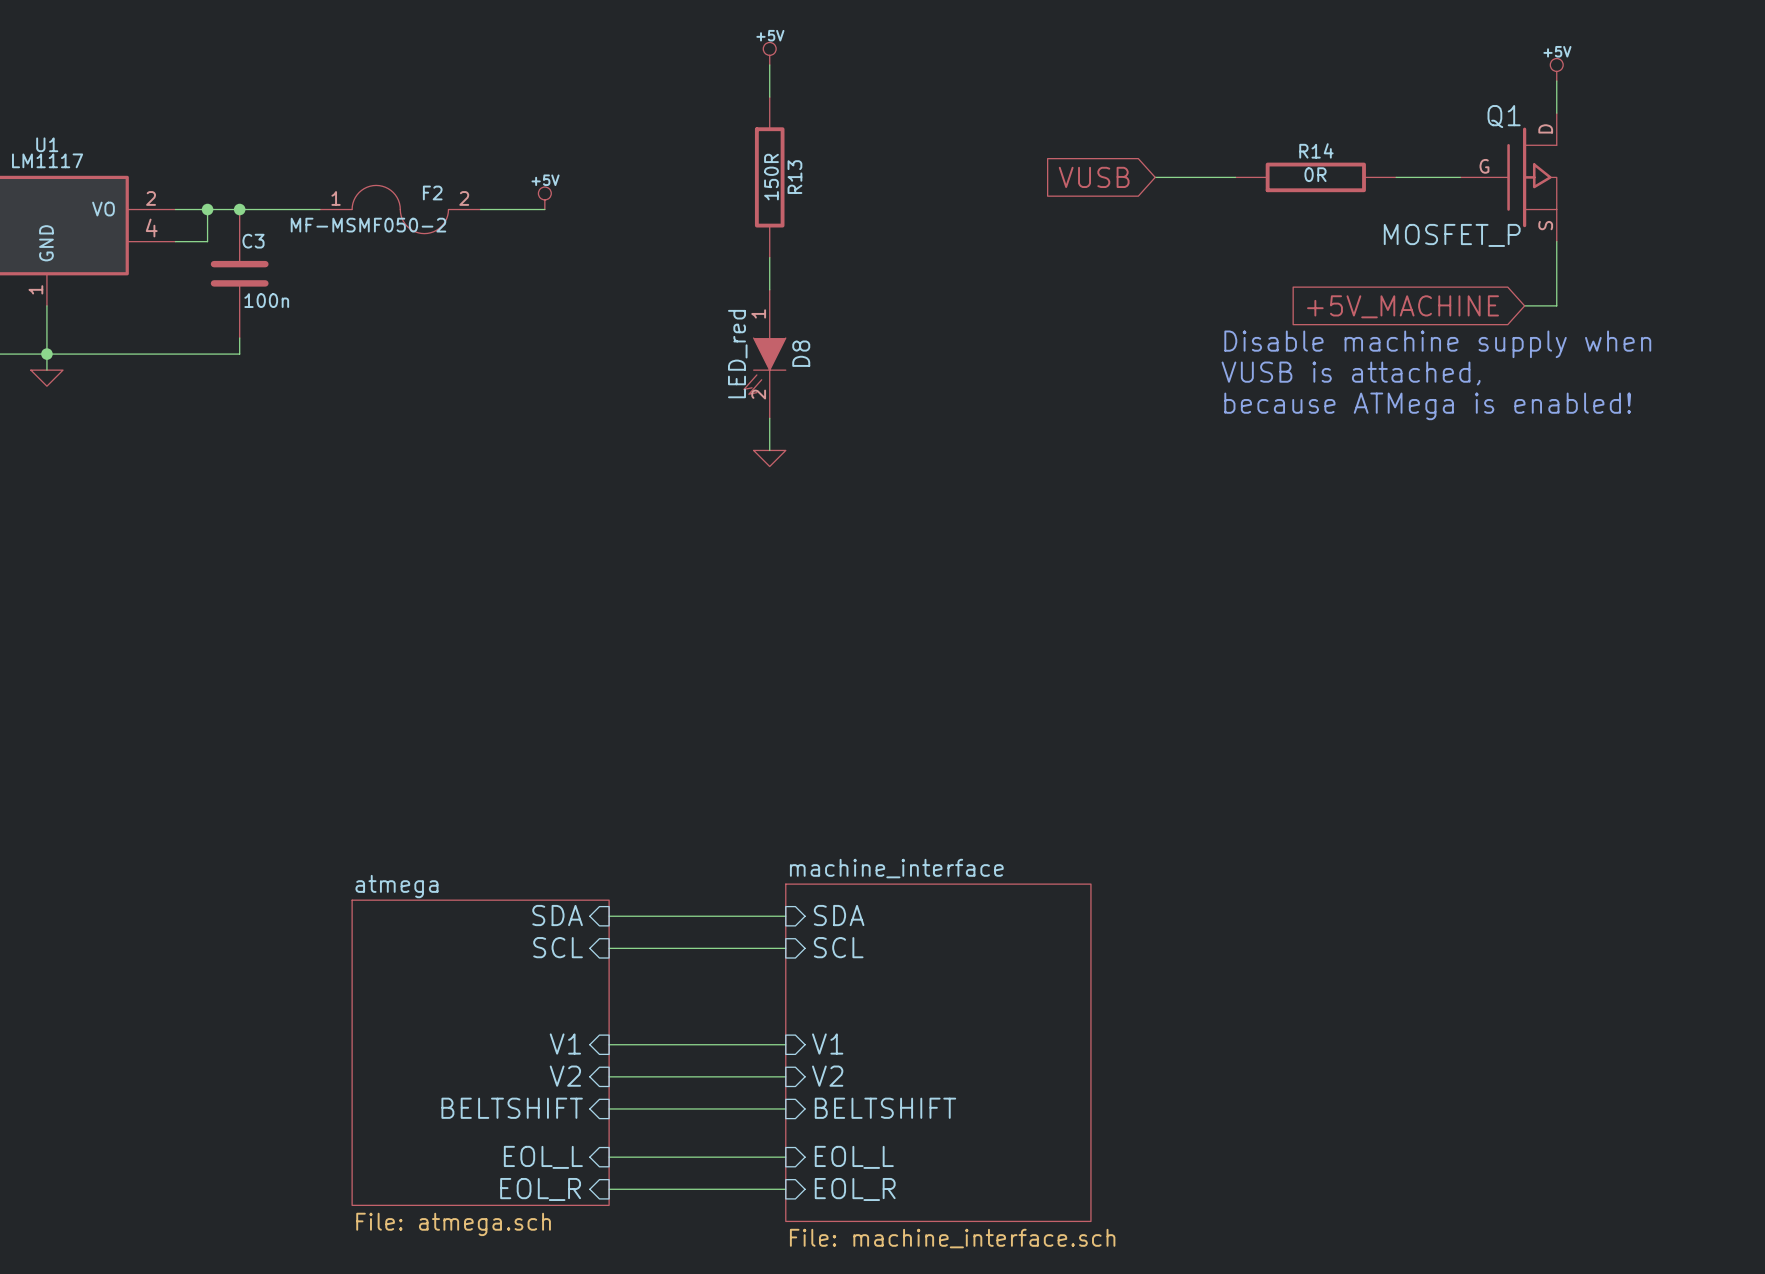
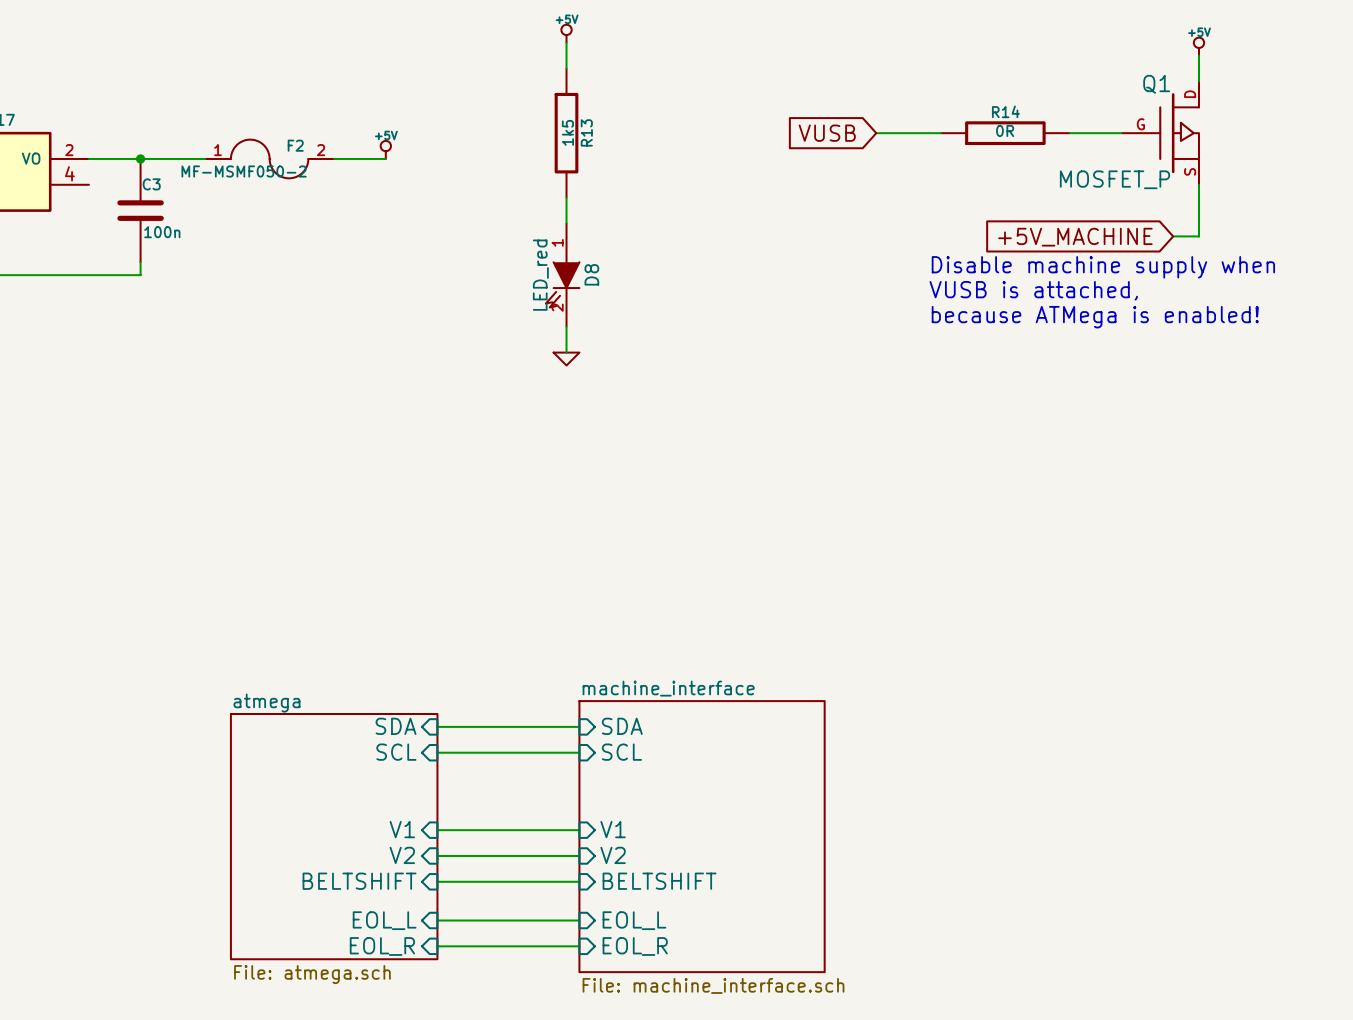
R13 value: 150R (771, 177) -> 1k5 (567, 132)
wire: (207, 209) (207, 241) (175, 241) -> none
junction: (207, 209) -> none

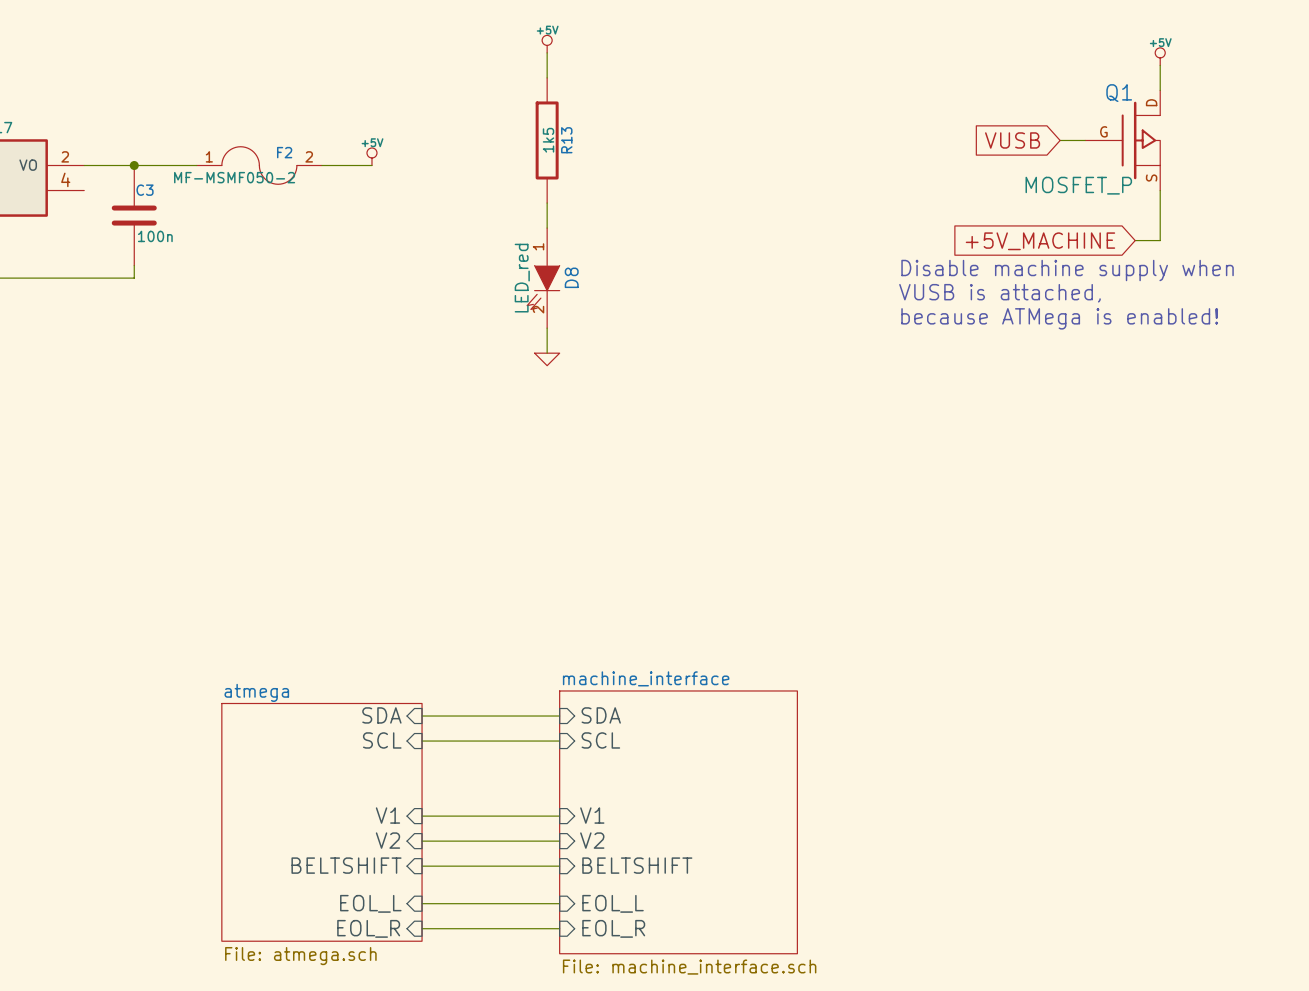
global label position: VUSB (827, 133) -> VUSB (1012, 140)
wire: (876, 133) (940, 133) -> none
R14: 0R (1005, 133) -> none
wire: (1069, 133) (1095, 133) -> none

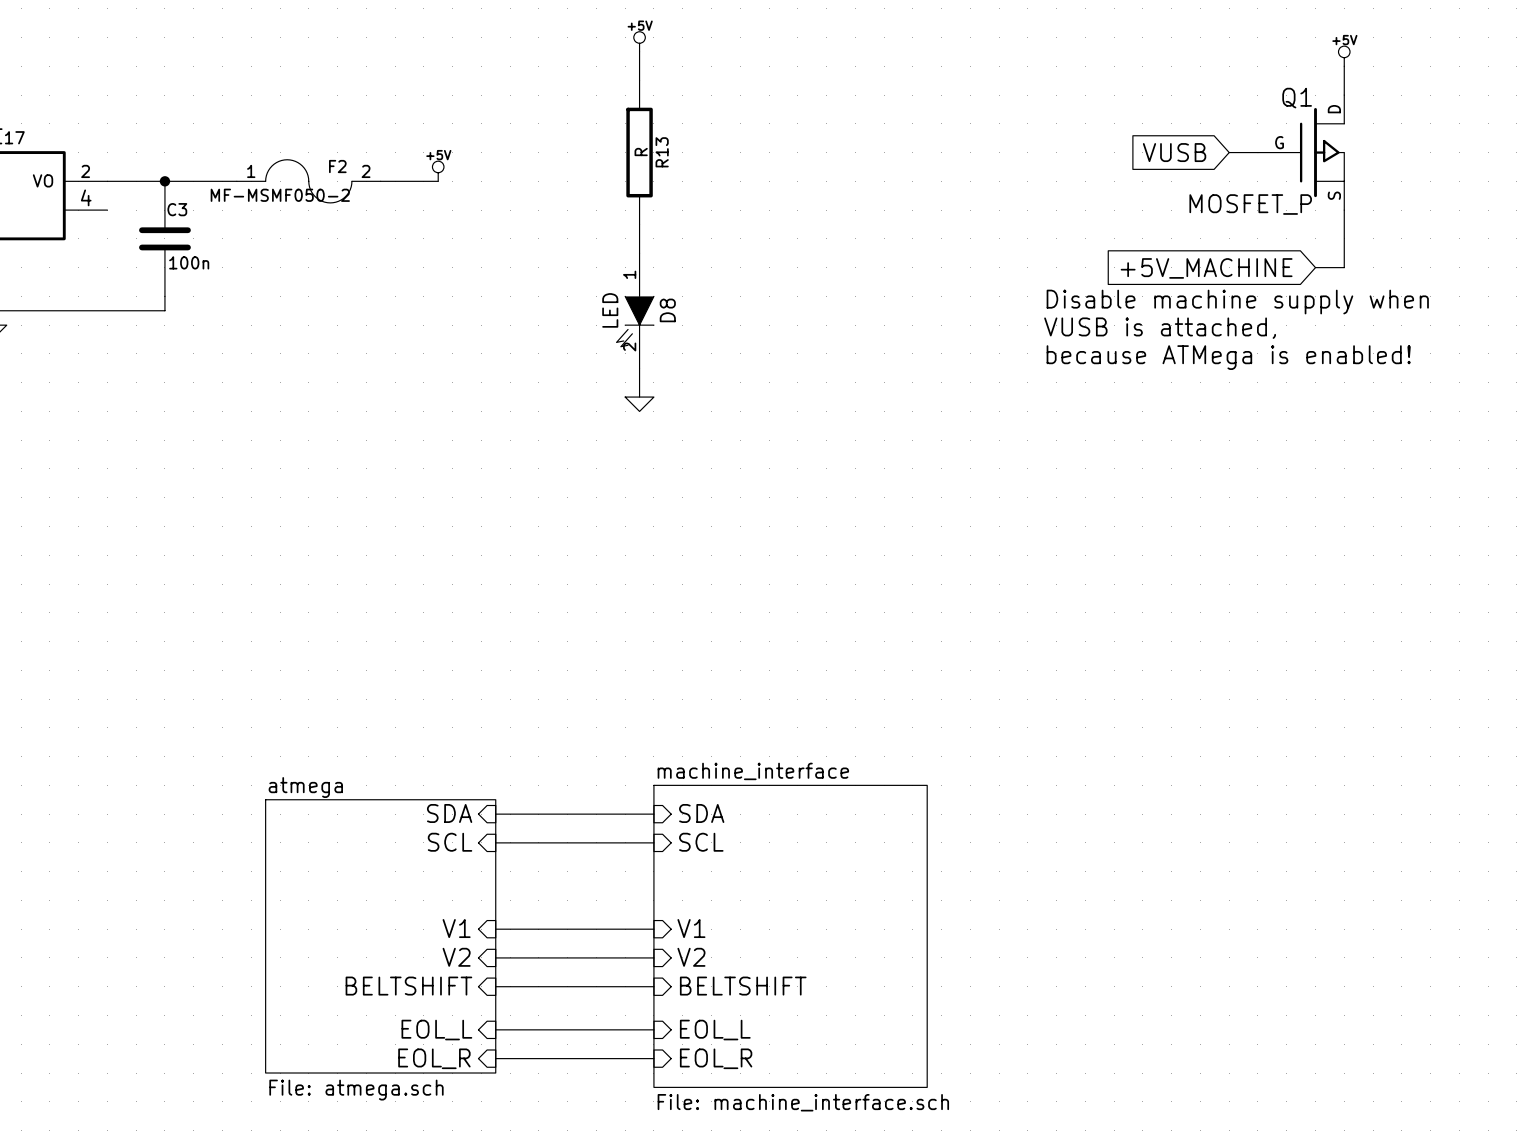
R13 value: 1k5 (548, 140) -> R (641, 152)
D8 value: LED_red (522, 278) -> LED (610, 310)

